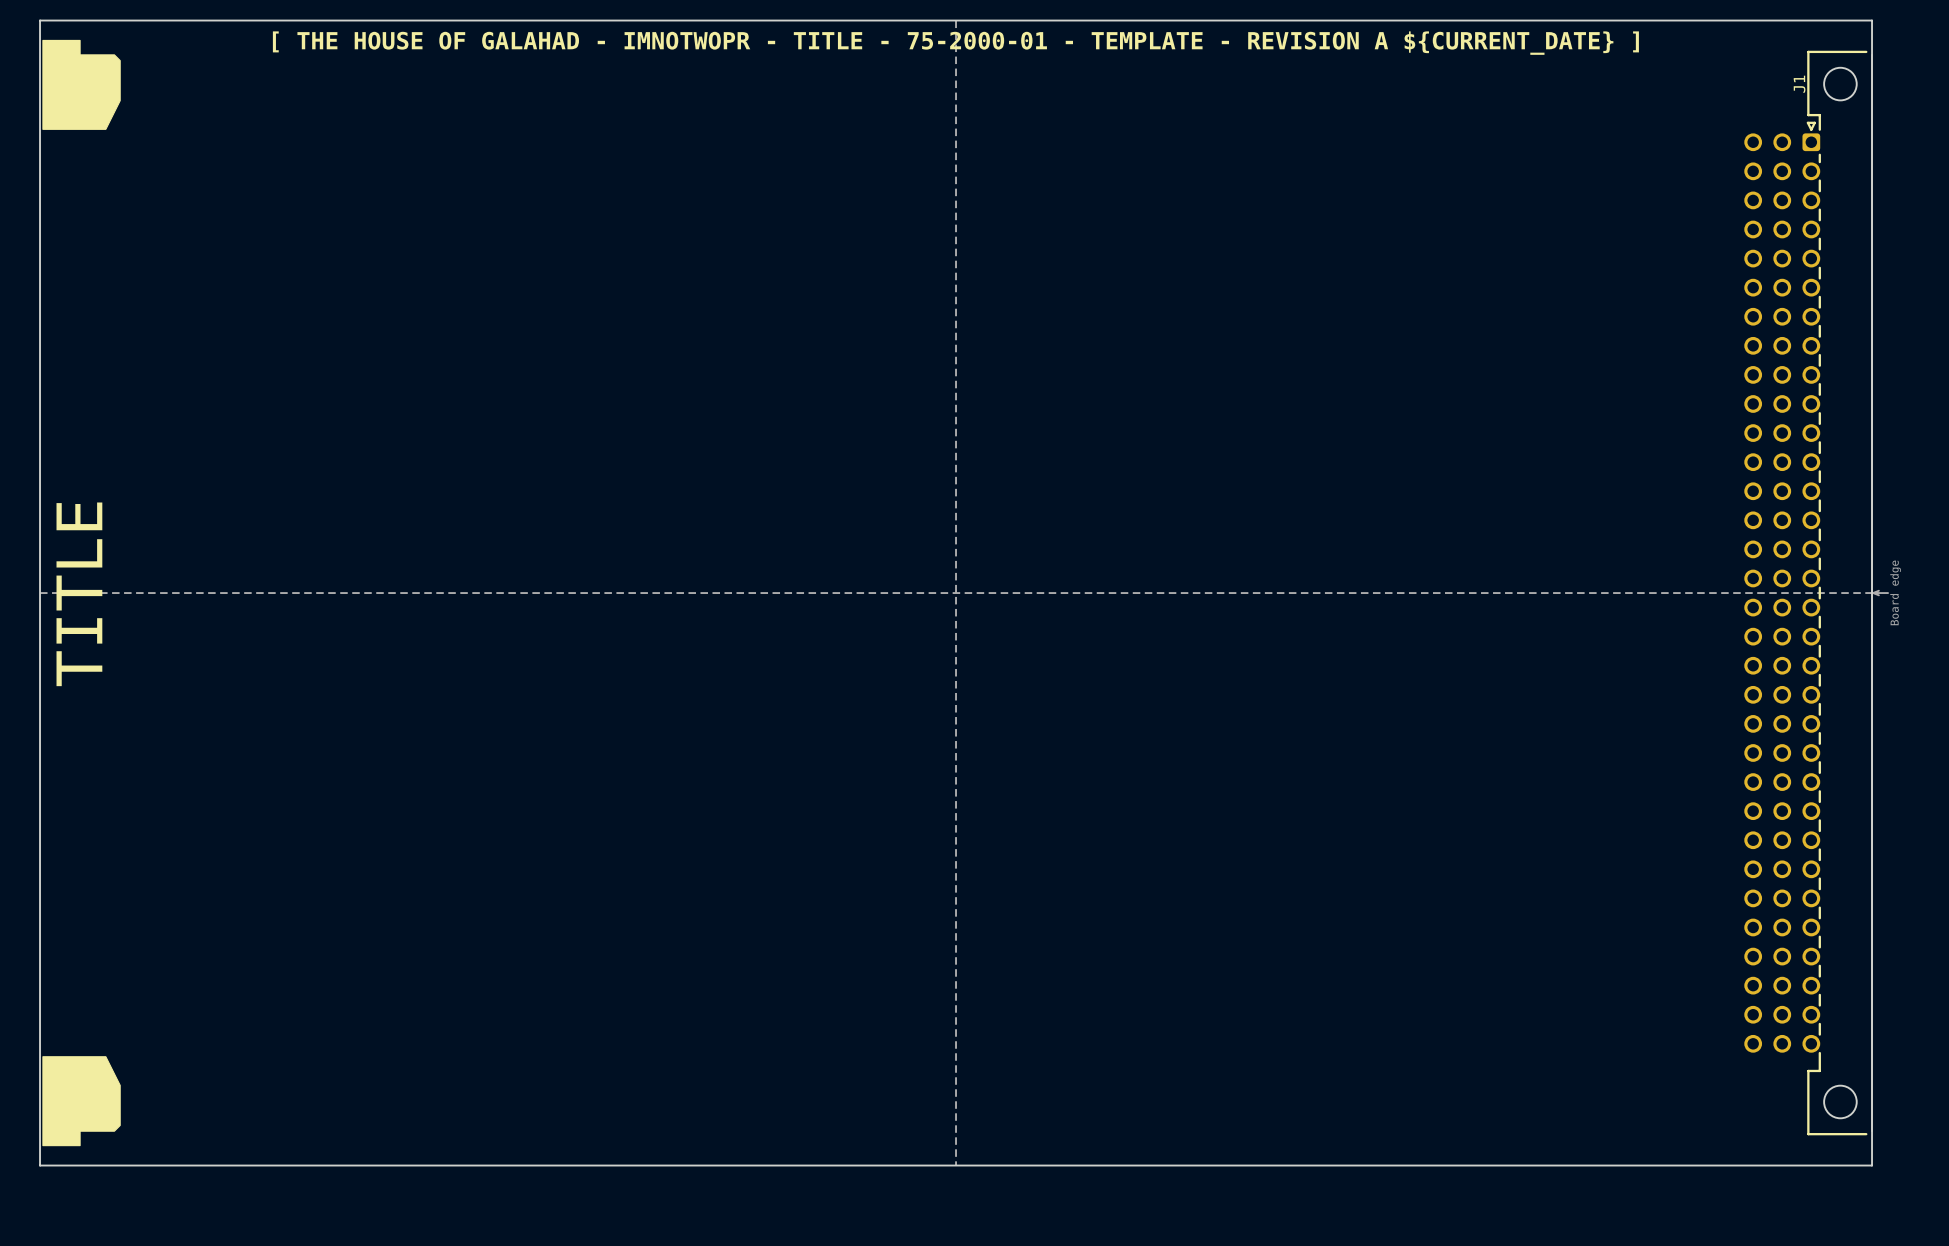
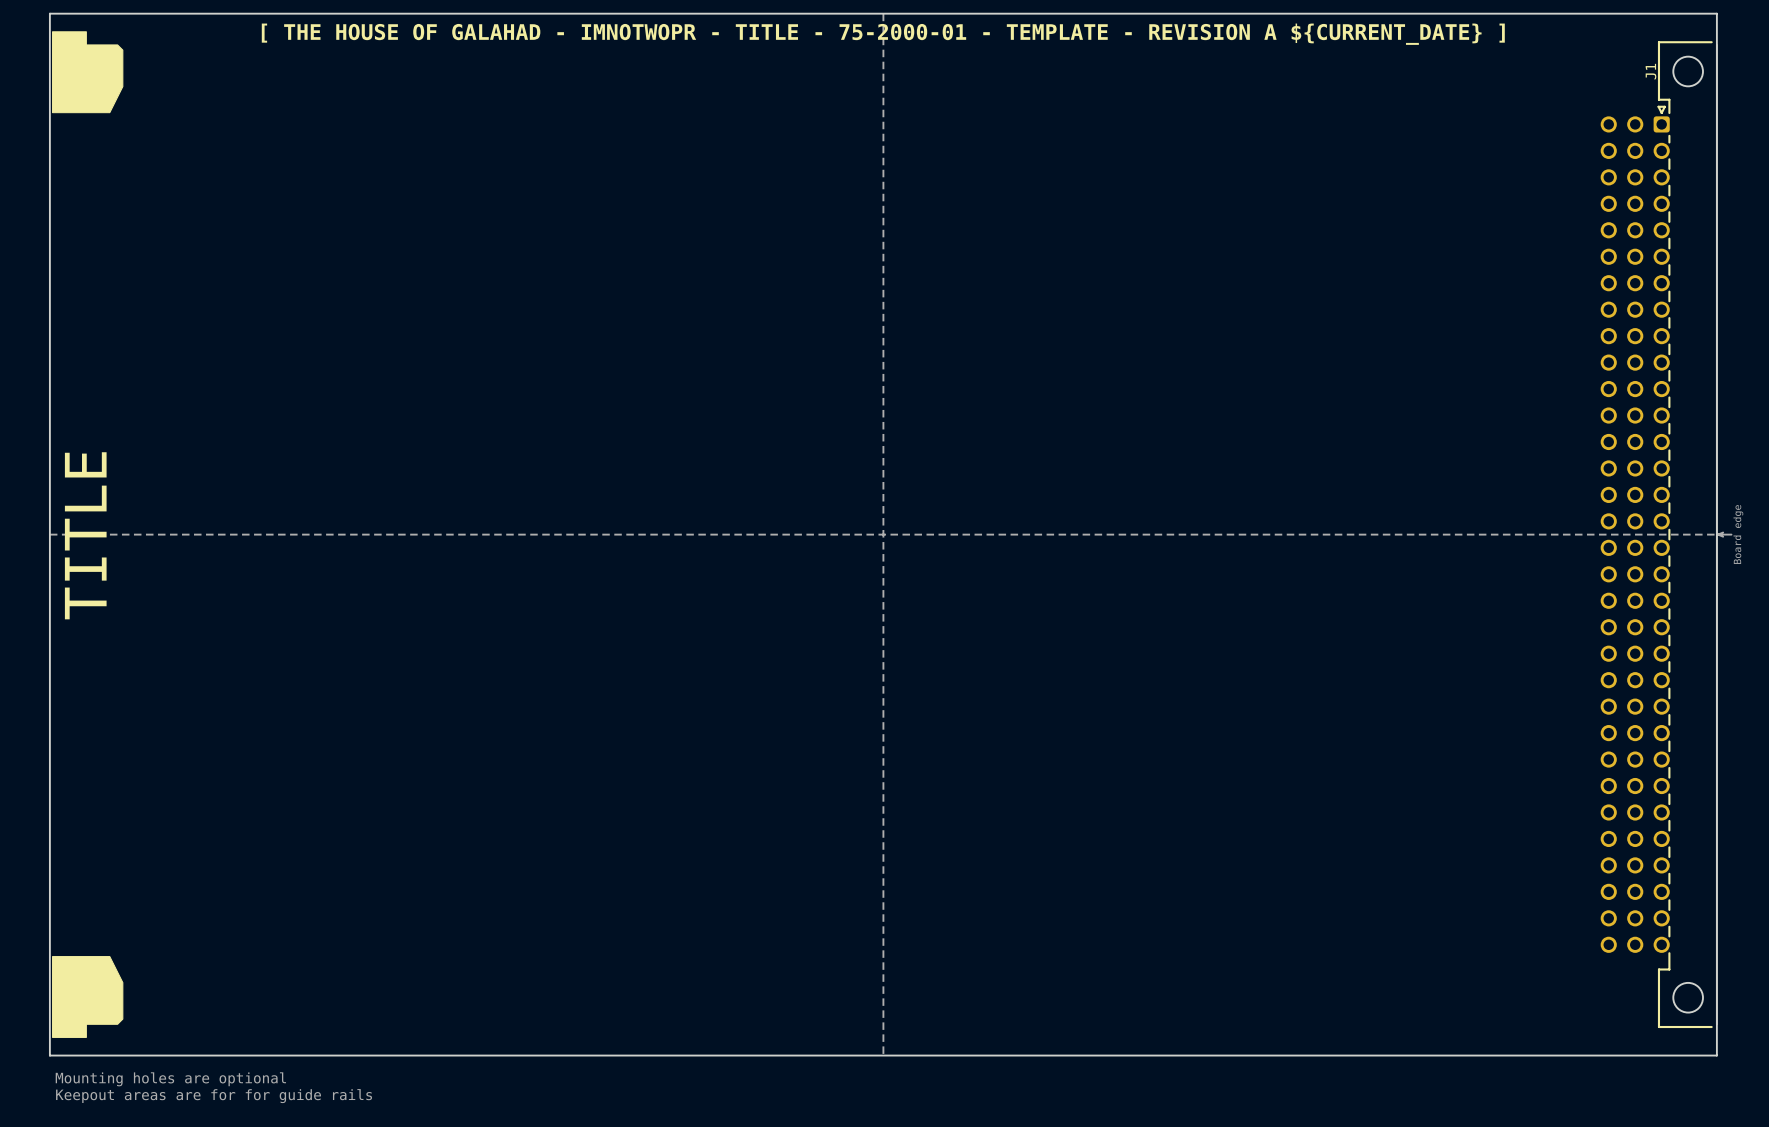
text: none -> Mounting holes are optional (170, 1079)
text: none -> Keepout areas are for for guide rails (214, 1096)

